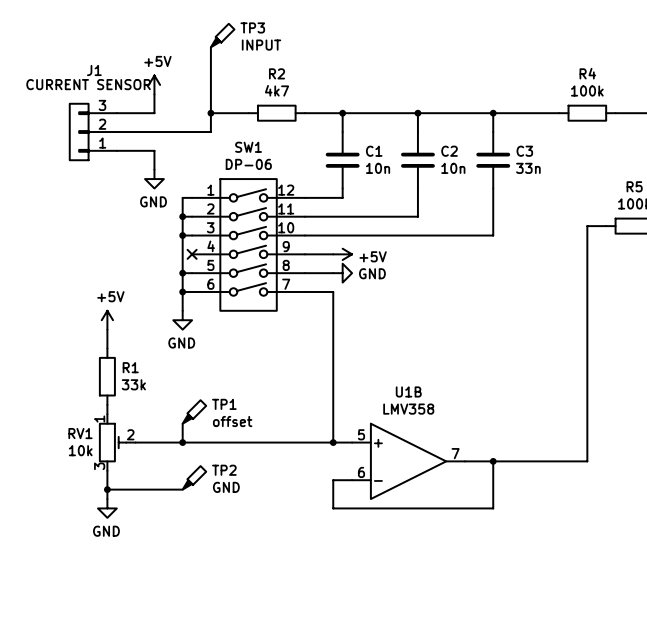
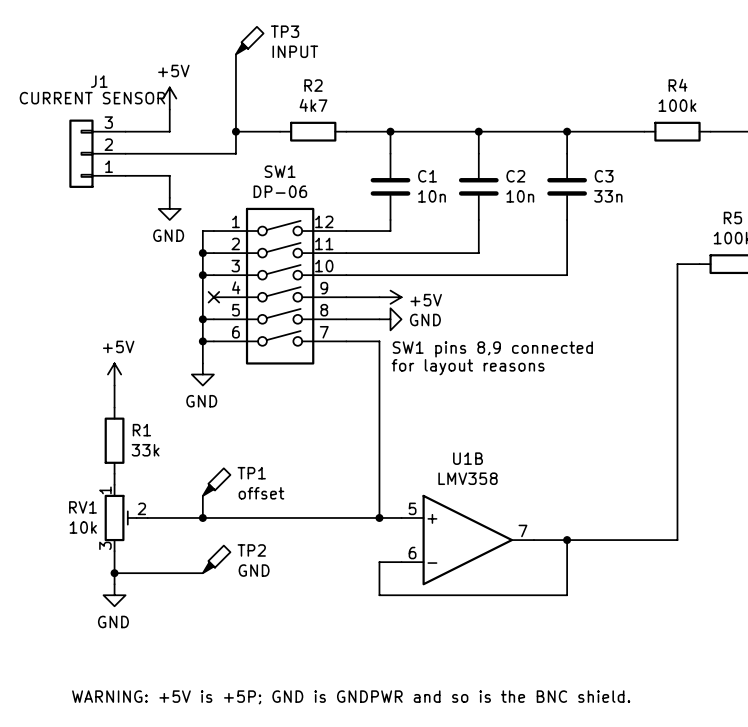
text: none -> SW1 pins 8,9 connected (492, 349)
text: none -> for layout reasons (468, 367)
text: none -> WARNING: +5V is +5P; GND is GNDPWR and so is the BNC shield. (351, 697)

